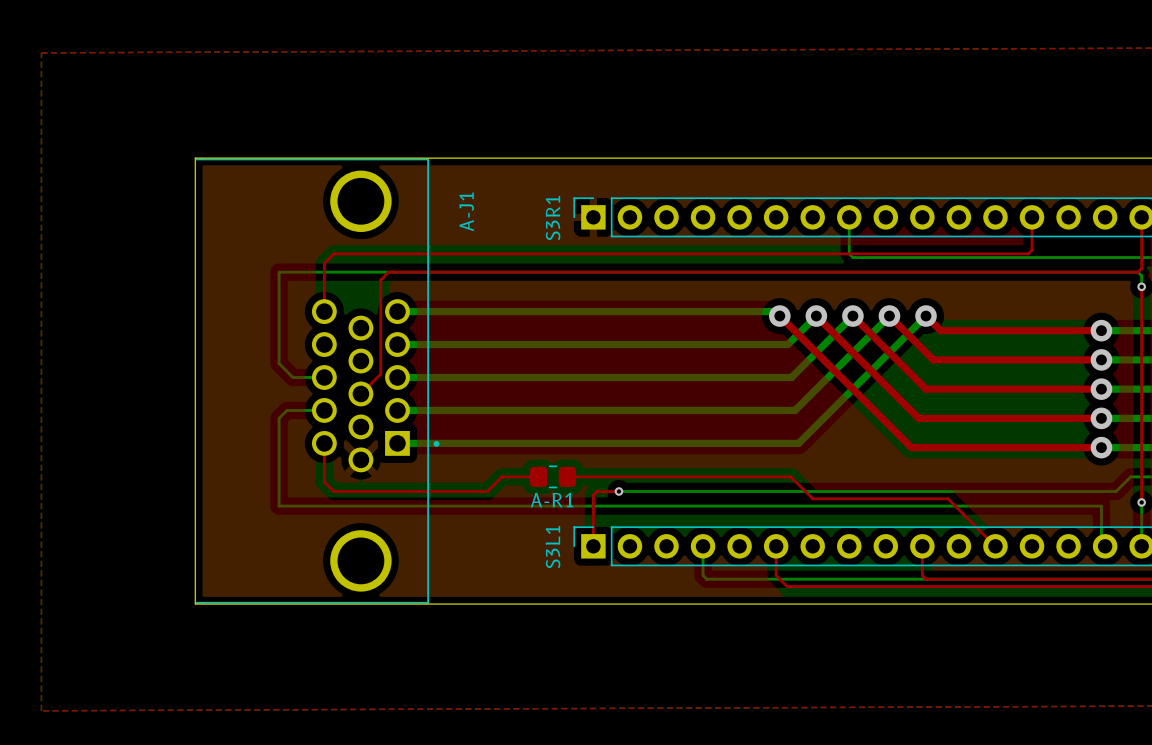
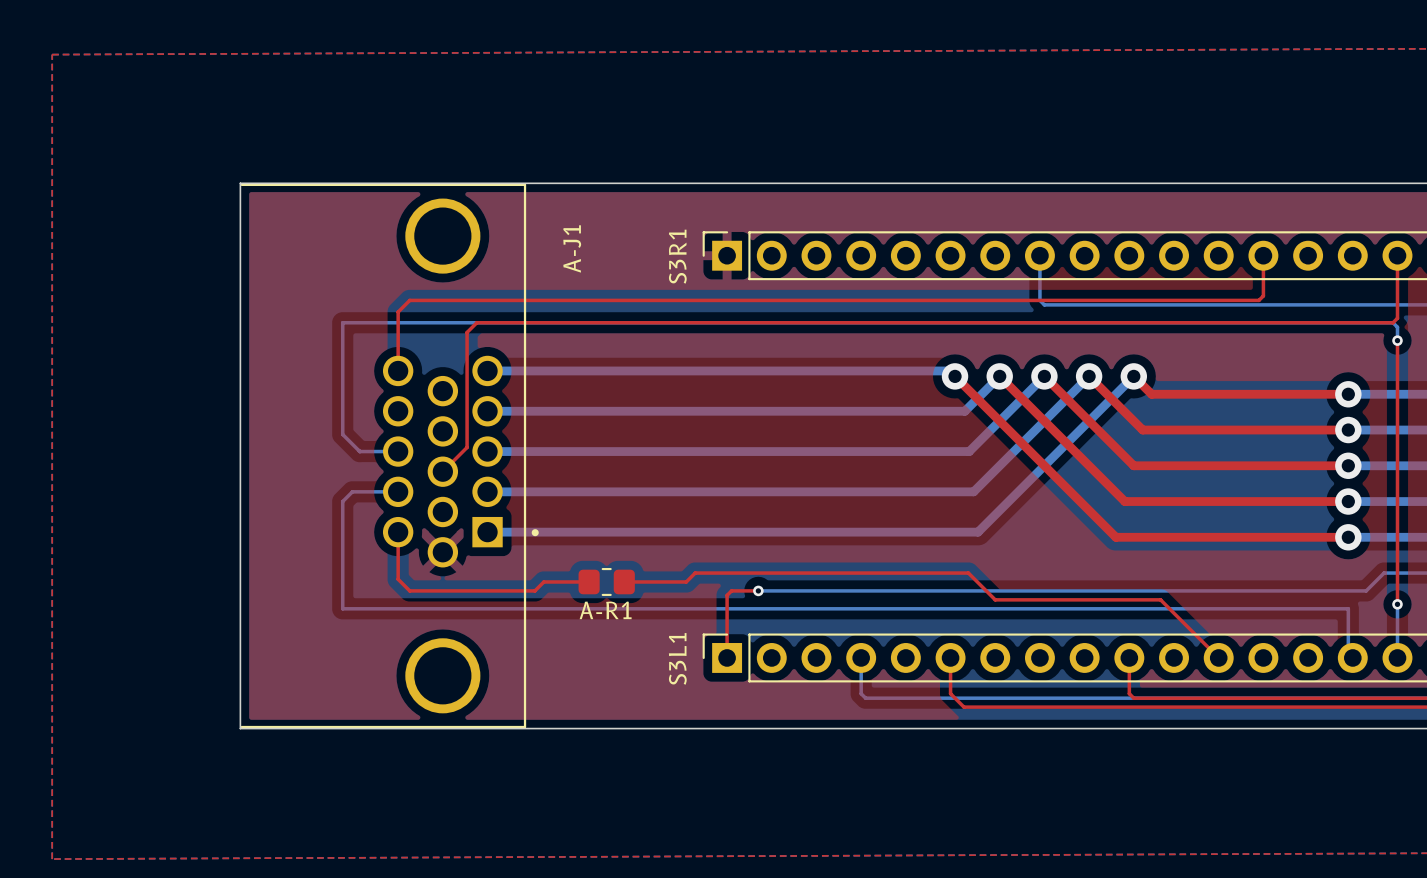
top track: (538, 476) (502, 476) (487, 491) (436, 491) -> (589, 581) (543, 581) (534, 590)
A-R1 position: (552, 476) -> (606, 581)
top track: none -> (695, 573) (686, 581) (624, 581)

